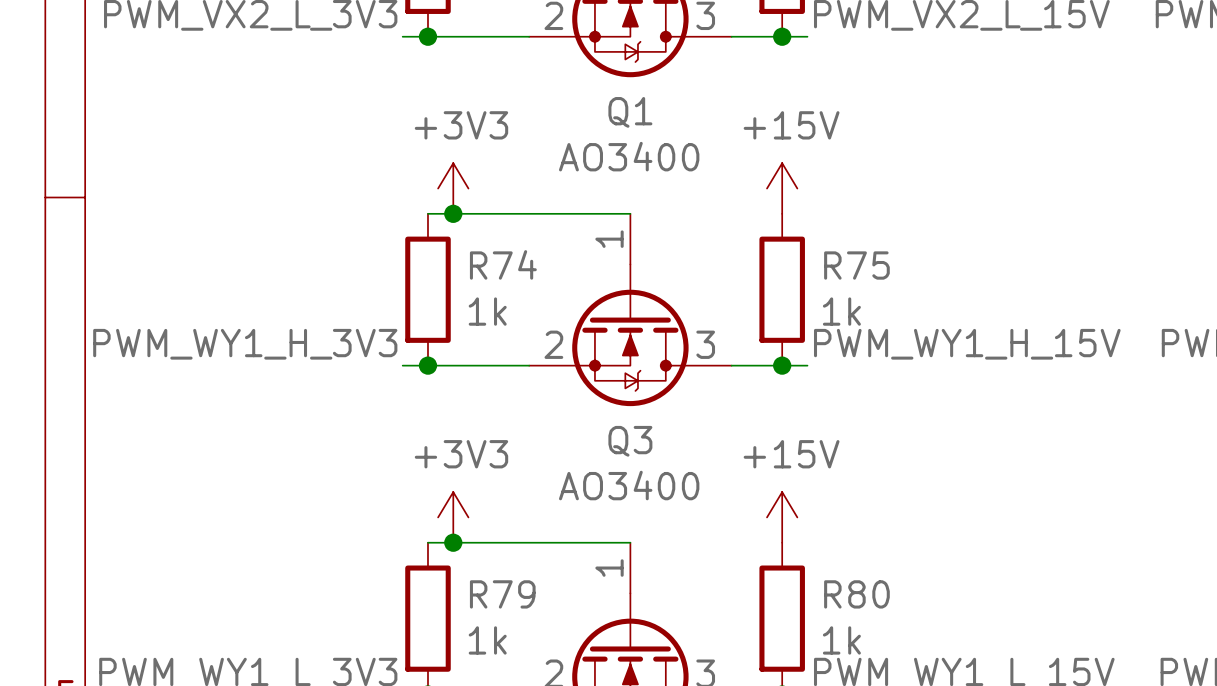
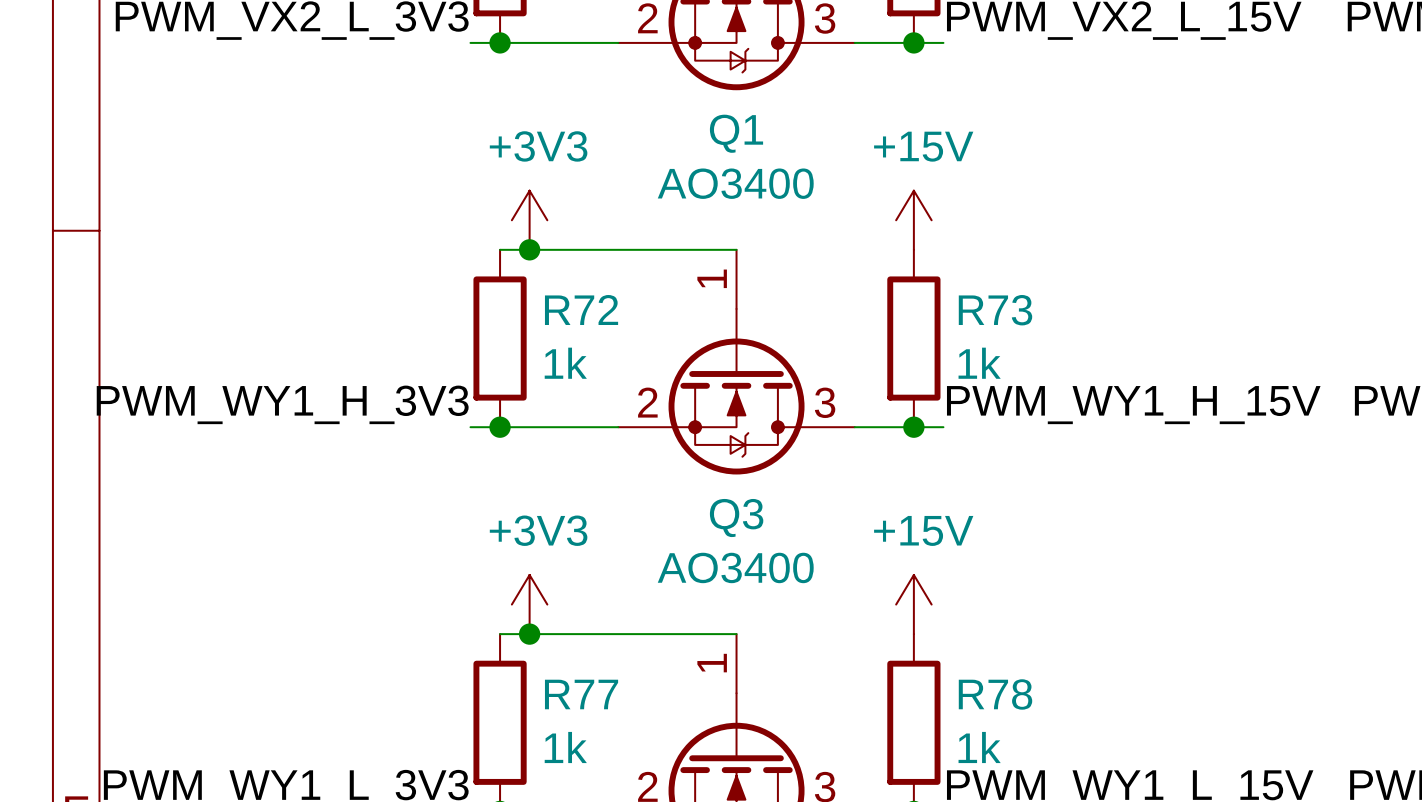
R74 name: R74 (503, 264) -> R72 (581, 309)
R75 name: R75 (856, 265) -> R73 (995, 310)
R79 name: R79 (502, 594) -> R77 (581, 694)
R80 name: R80 (856, 594) -> R78 (995, 694)

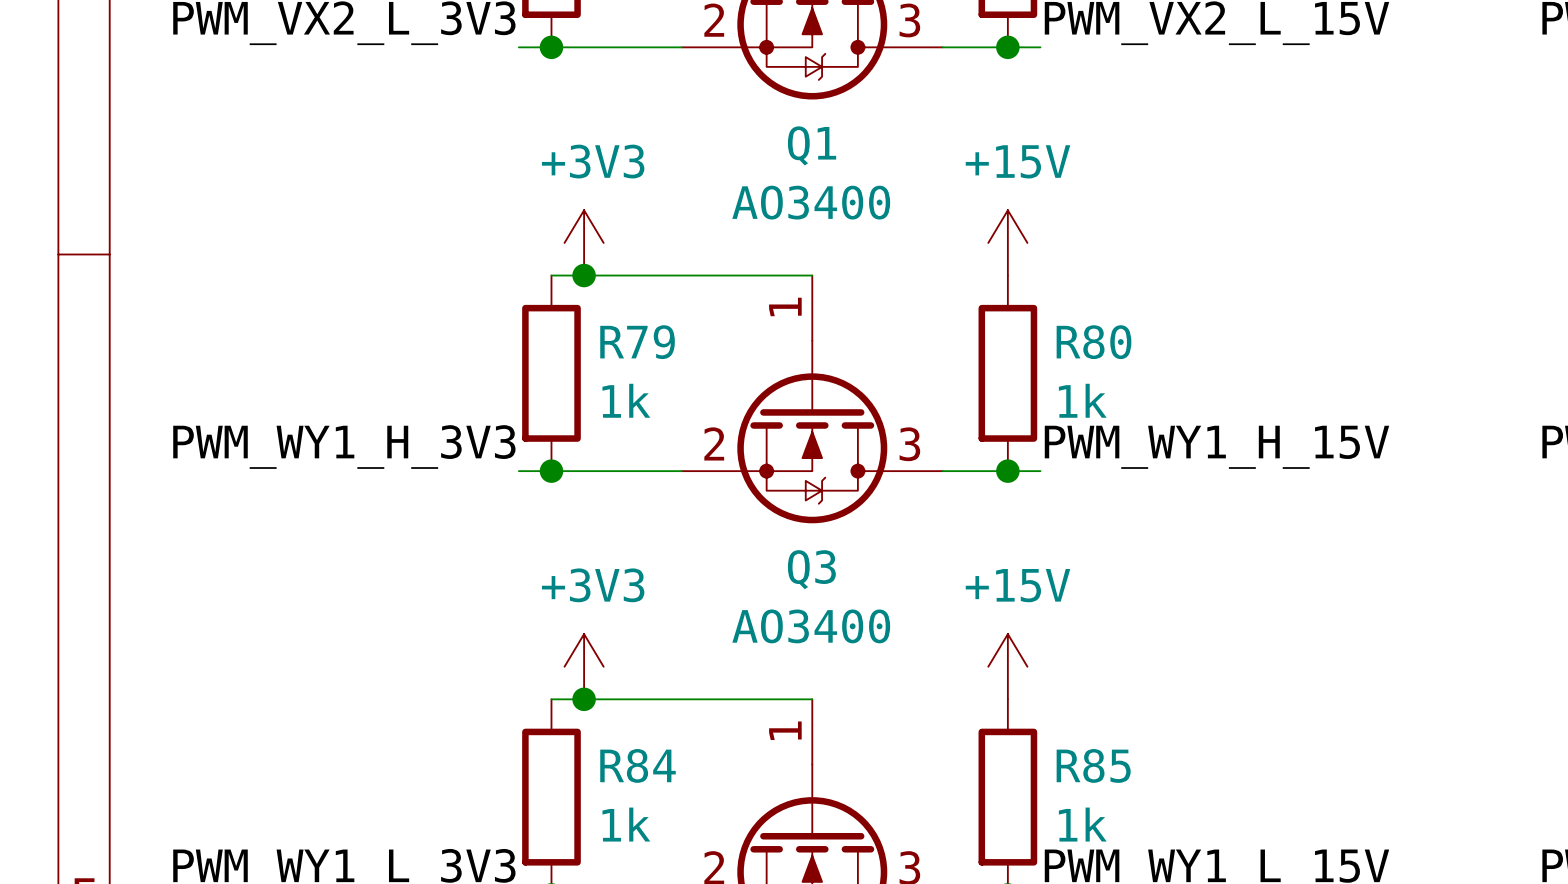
R72 name: R72 (581, 309) -> R79 (637, 342)
R73 name: R73 (995, 310) -> R80 (1094, 342)
R77 name: R77 (581, 694) -> R84 (637, 765)
R78 name: R78 (995, 694) -> R85 (1093, 765)

